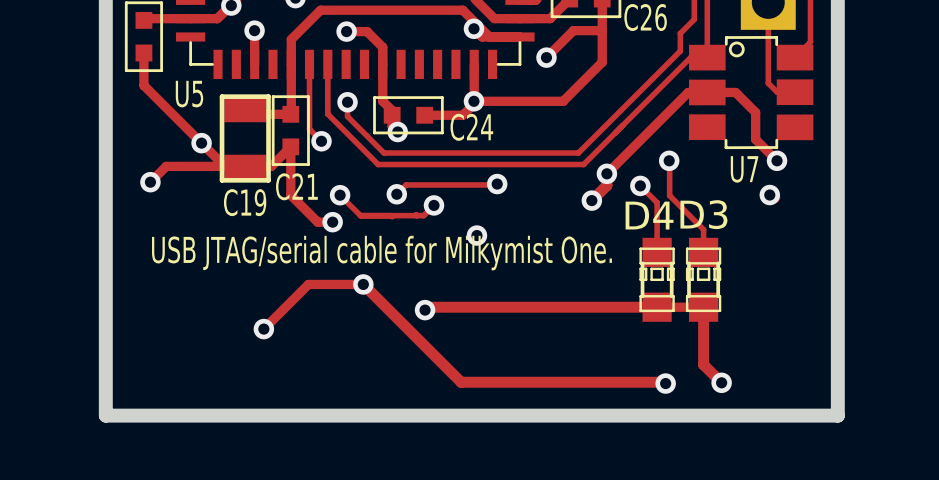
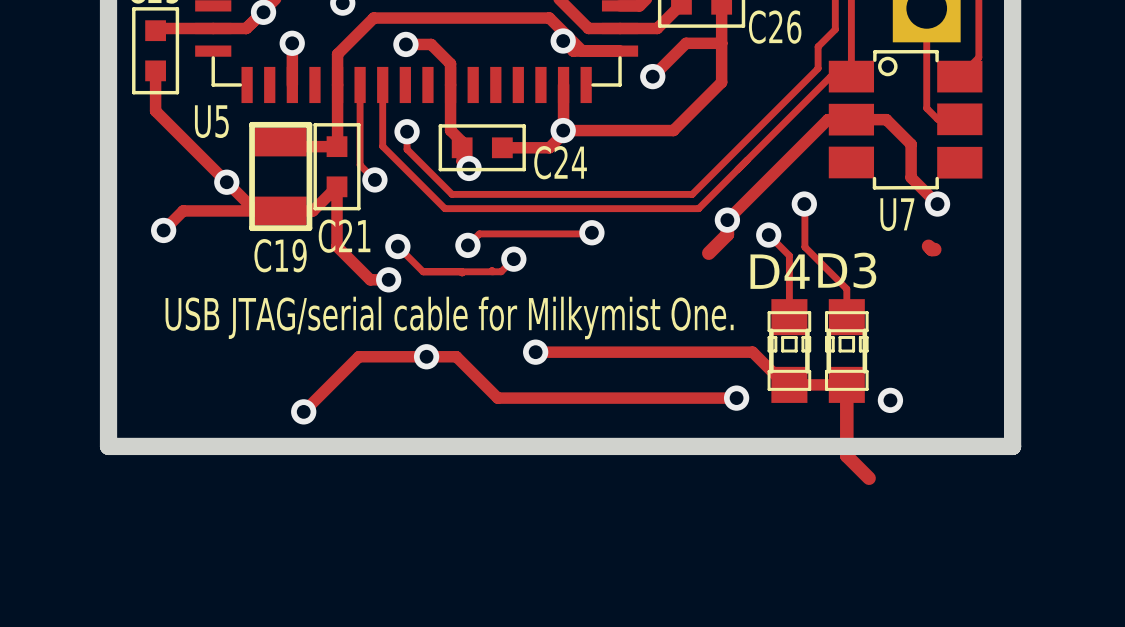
via: (769, 195) -> none
via: (591, 200) -> none
via: (476, 235) -> none
via: none -> (535, 352)
track: (363, 284) (461, 382) (665, 383) -> (426, 356) (456, 356) (497, 398) (736, 398)
track: (653, 307) (427, 307) (425, 310) -> (785, 384) (752, 352) (535, 352)
via: (425, 310) -> none
via: none -> (736, 398)
via: none -> (890, 400)
board edge: (105, 357) (105, 415) (837, 415) (837, 357) -> (108, 446) (1012, 446)
via: (721, 382) -> none
via: (665, 383) -> none

